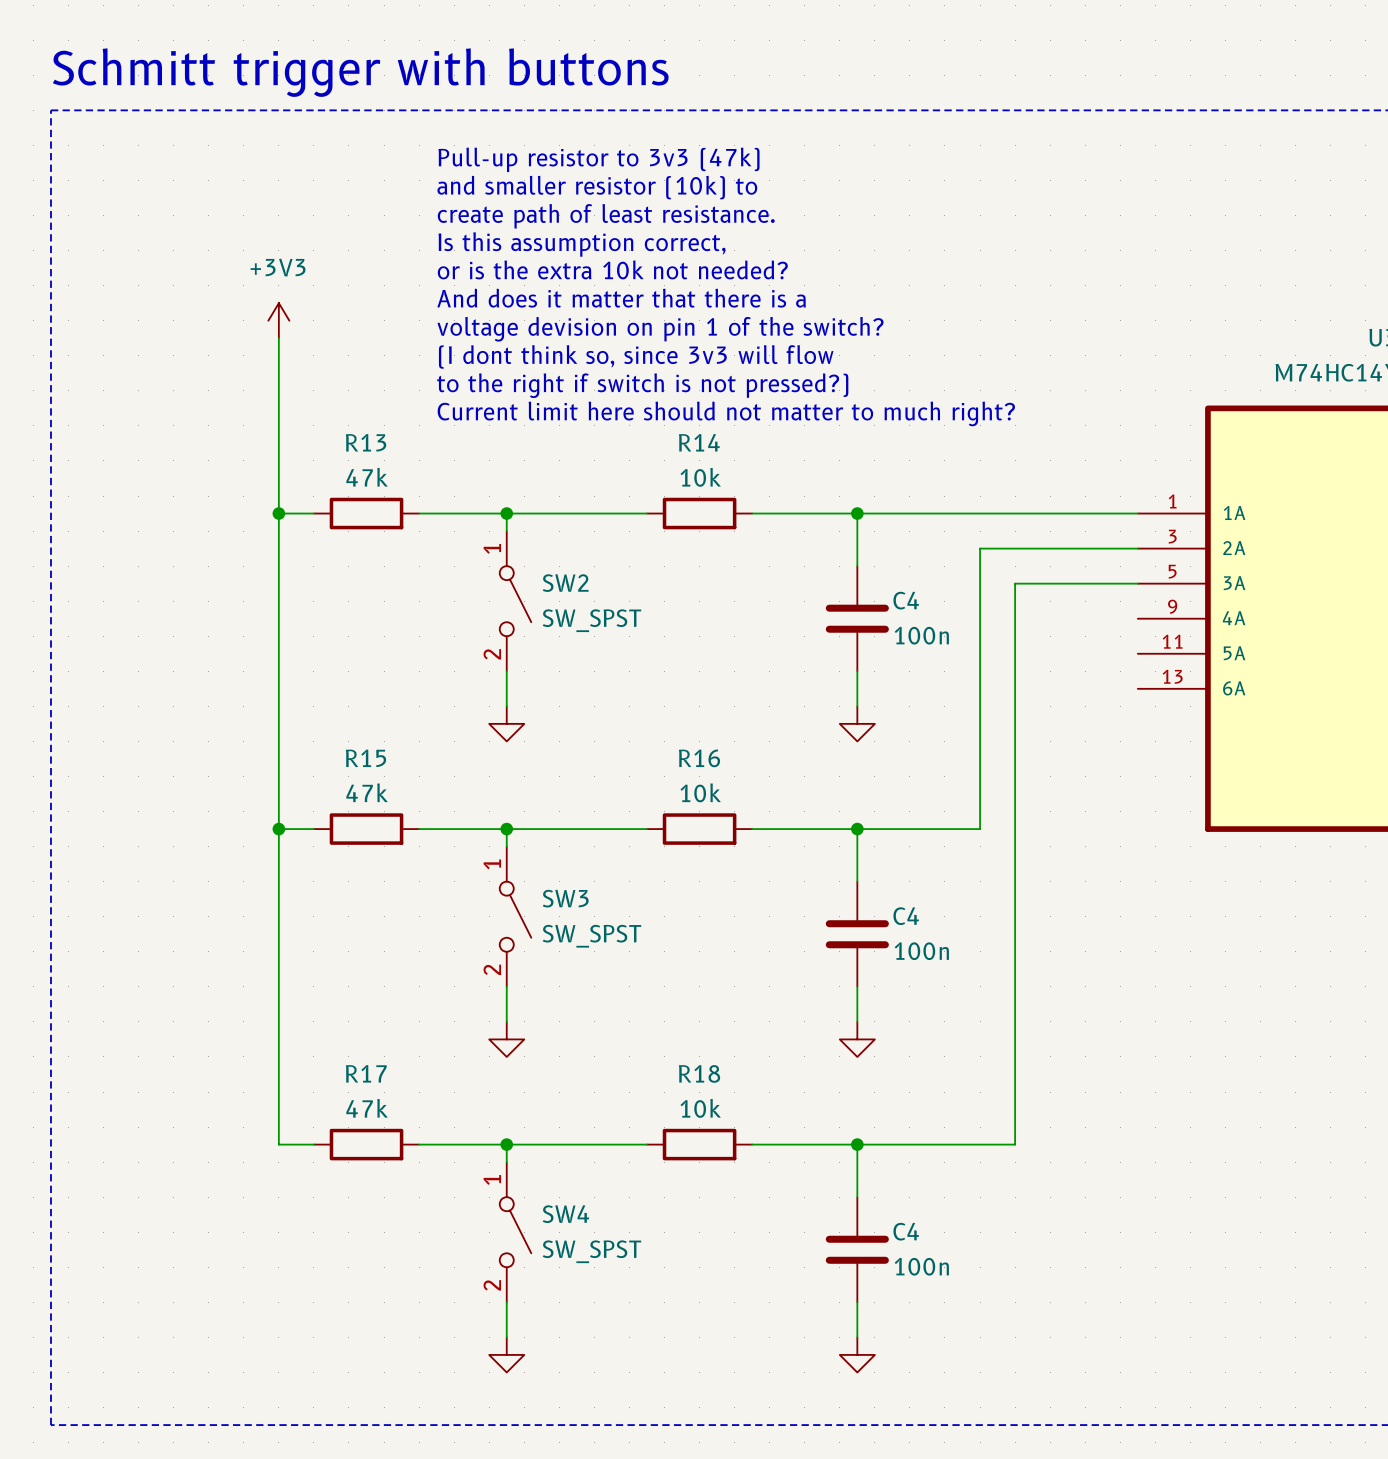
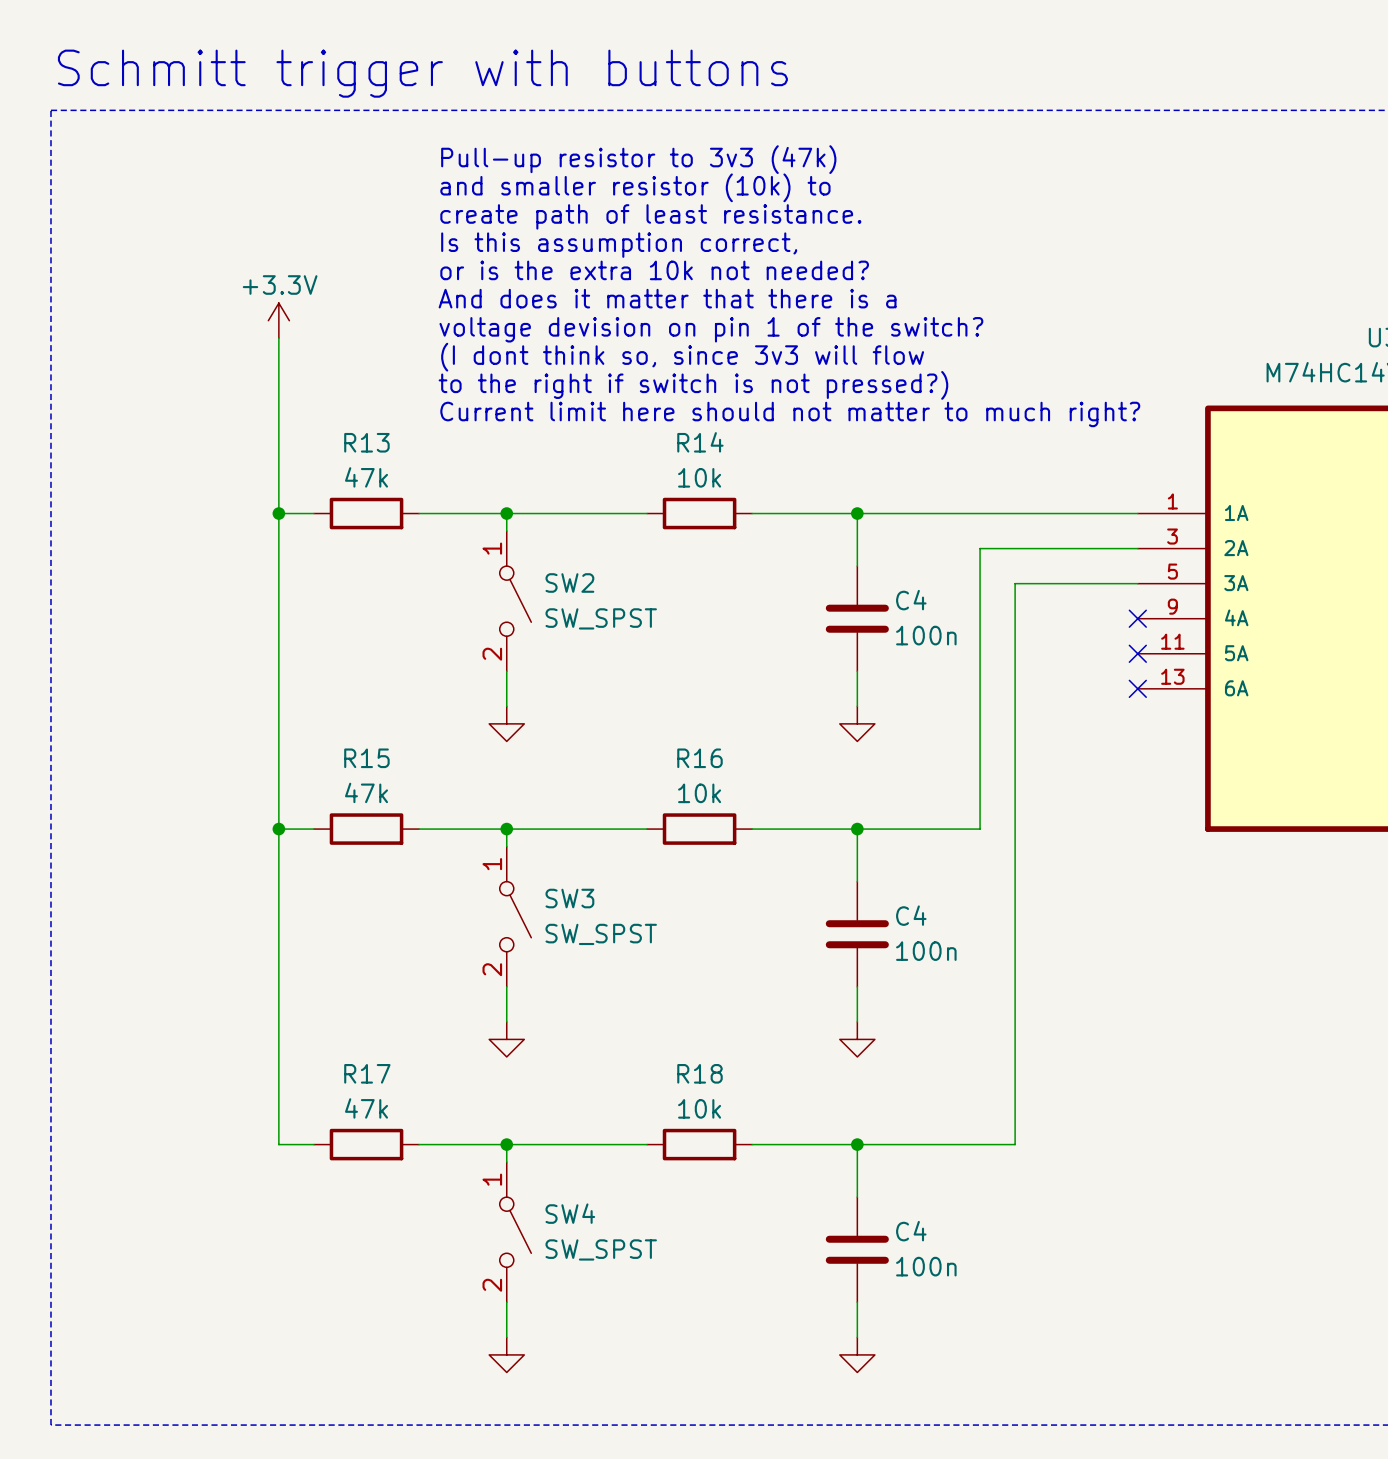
power symbol: +3V3 (278, 320) -> +3.3V (278, 320)
no-connect mark: none -> (1137, 618)
no-connect mark: none -> (1137, 653)
no-connect mark: none -> (1137, 688)

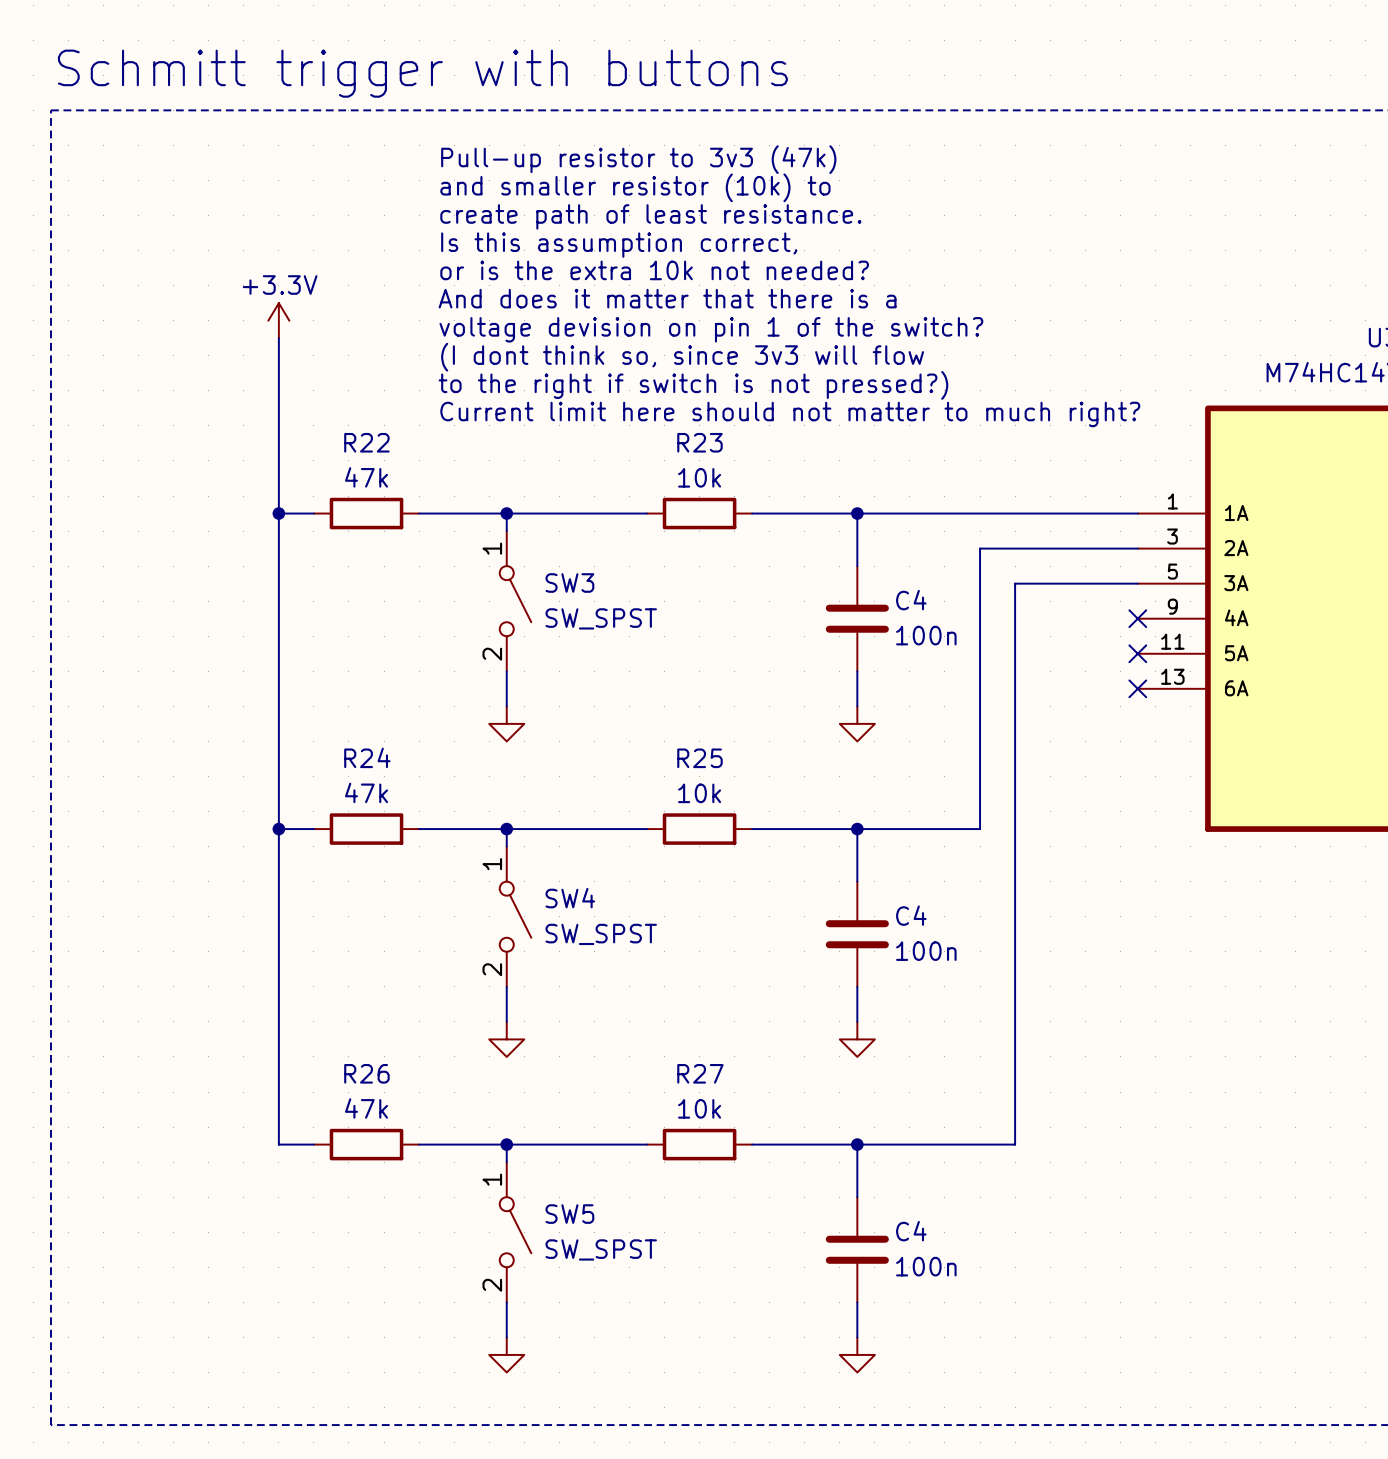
R13 name: R13 (366, 442) -> R22 (366, 442)
R14 name: R14 (700, 442) -> R23 (699, 442)
SW2 name: SW2 (569, 582) -> SW3 (569, 582)
R15 name: R15 (366, 758) -> R24 (367, 757)
R16 name: R16 (699, 758) -> R25 (699, 758)
SW3 name: SW3 (569, 898) -> SW4 (570, 898)
R17 name: R17 (367, 1073) -> R26 (366, 1073)
R18 name: R18 (699, 1073) -> R27 (700, 1073)
SW4 name: SW4 (570, 1213) -> SW5 (569, 1214)

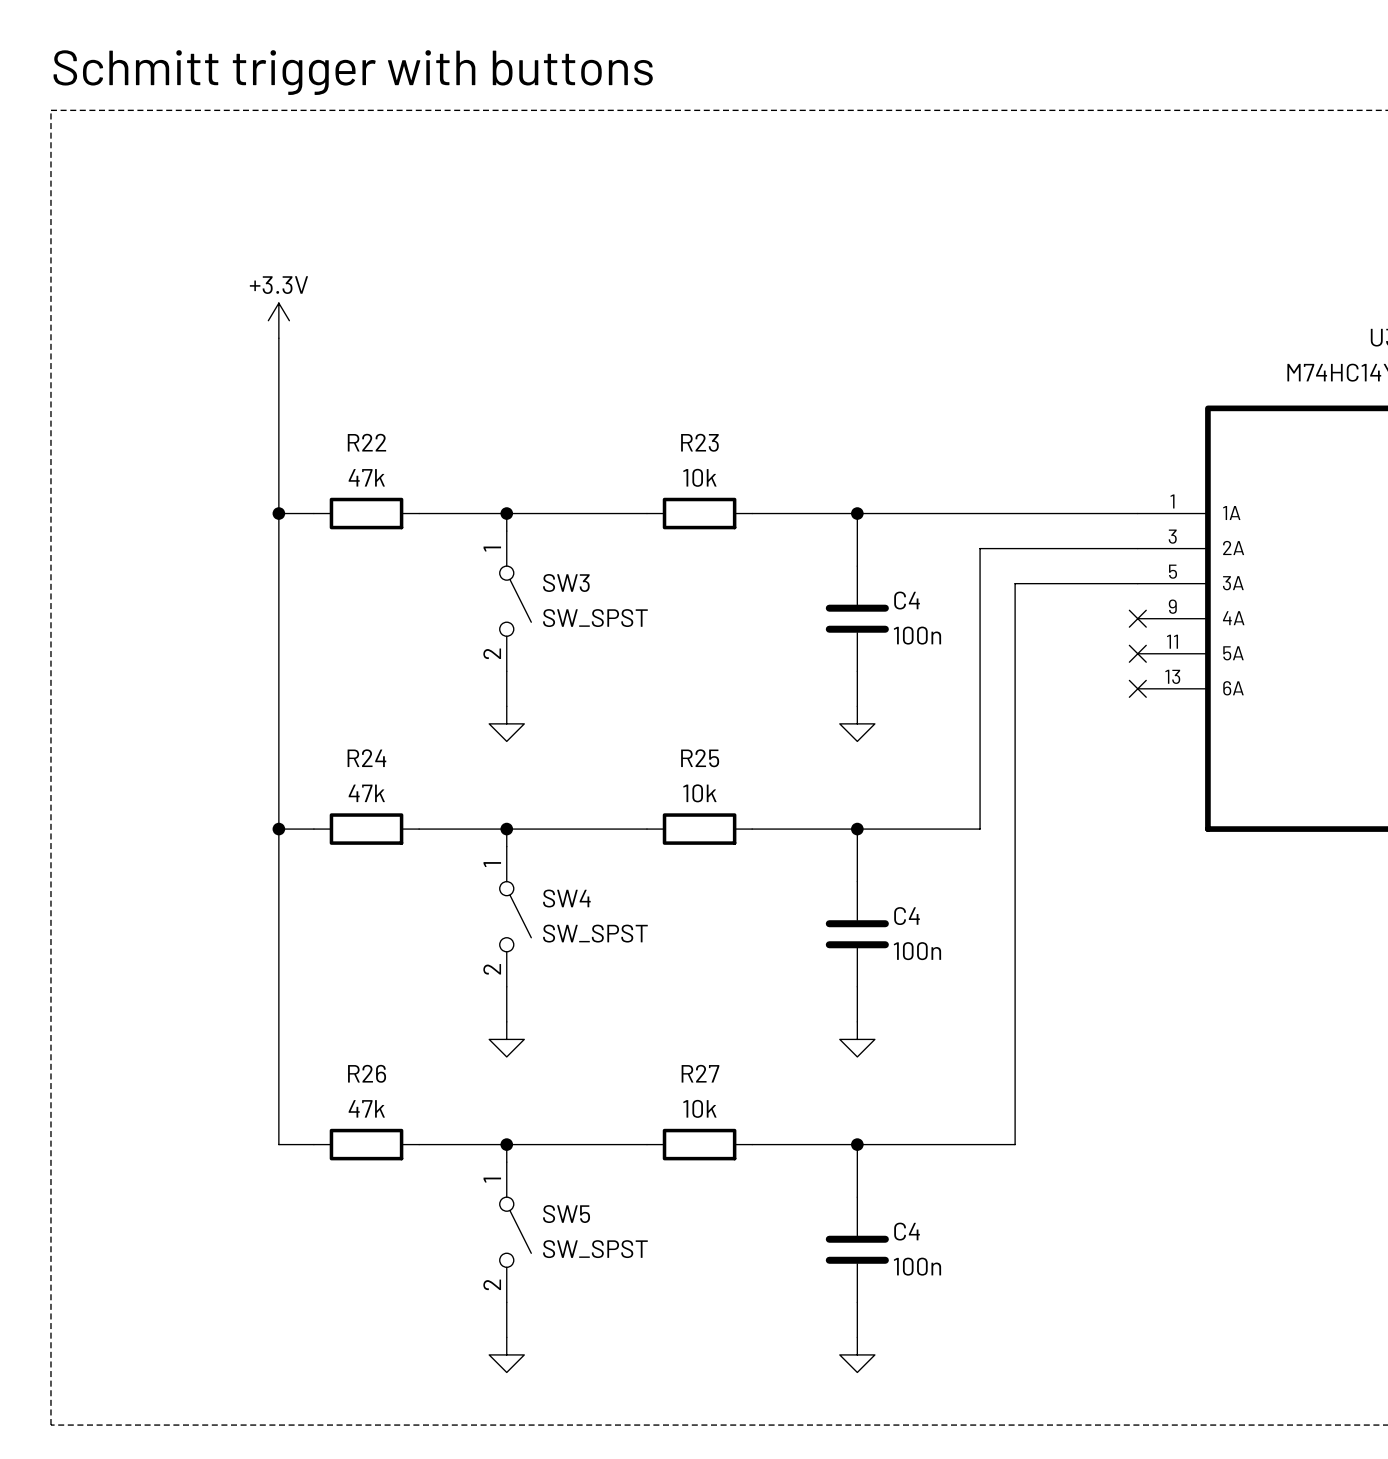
text: Pull-up resistor to 3v3 (47k) (638, 159) -> none
text: and smaller resistor (10k) to (635, 187) -> none
text: create path of least resistance. (650, 216) -> none
text: Is this assumption correct, (619, 245) -> none
text: or is the extra 10k not needed? (654, 270) -> none
text: And does it matter that there is a (667, 298) -> none
text: voltage devision on pin 1 of the switch? (711, 329) -> none
text: (I dont think so, since 3v3 will flow (682, 357) -> none
text: to the right if switch is not pressed?) (693, 385) -> none
text: Current limit here should not matter to much right? (790, 414) -> none

